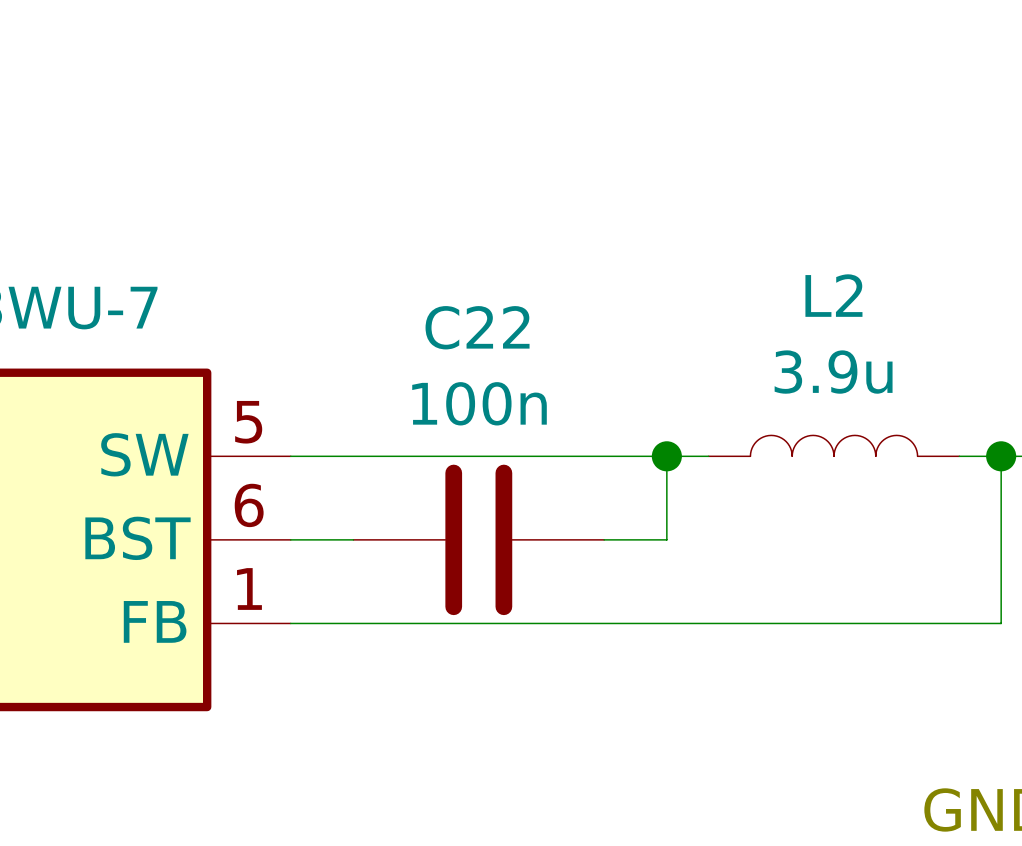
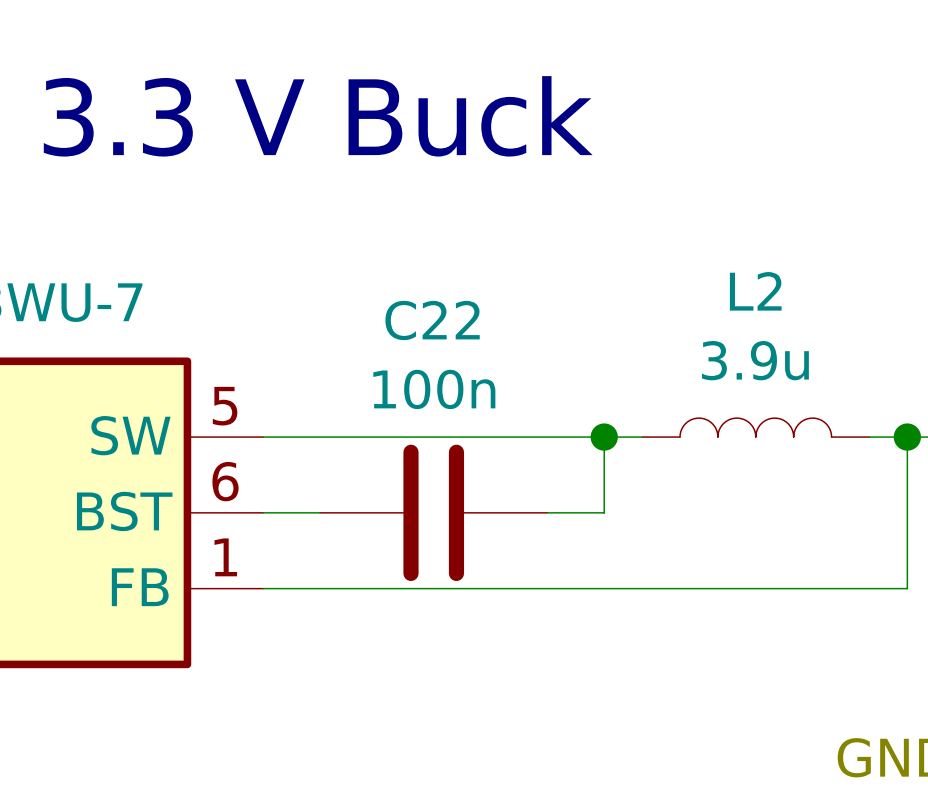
text: none -> 3.3 V Buck (318, 116)

